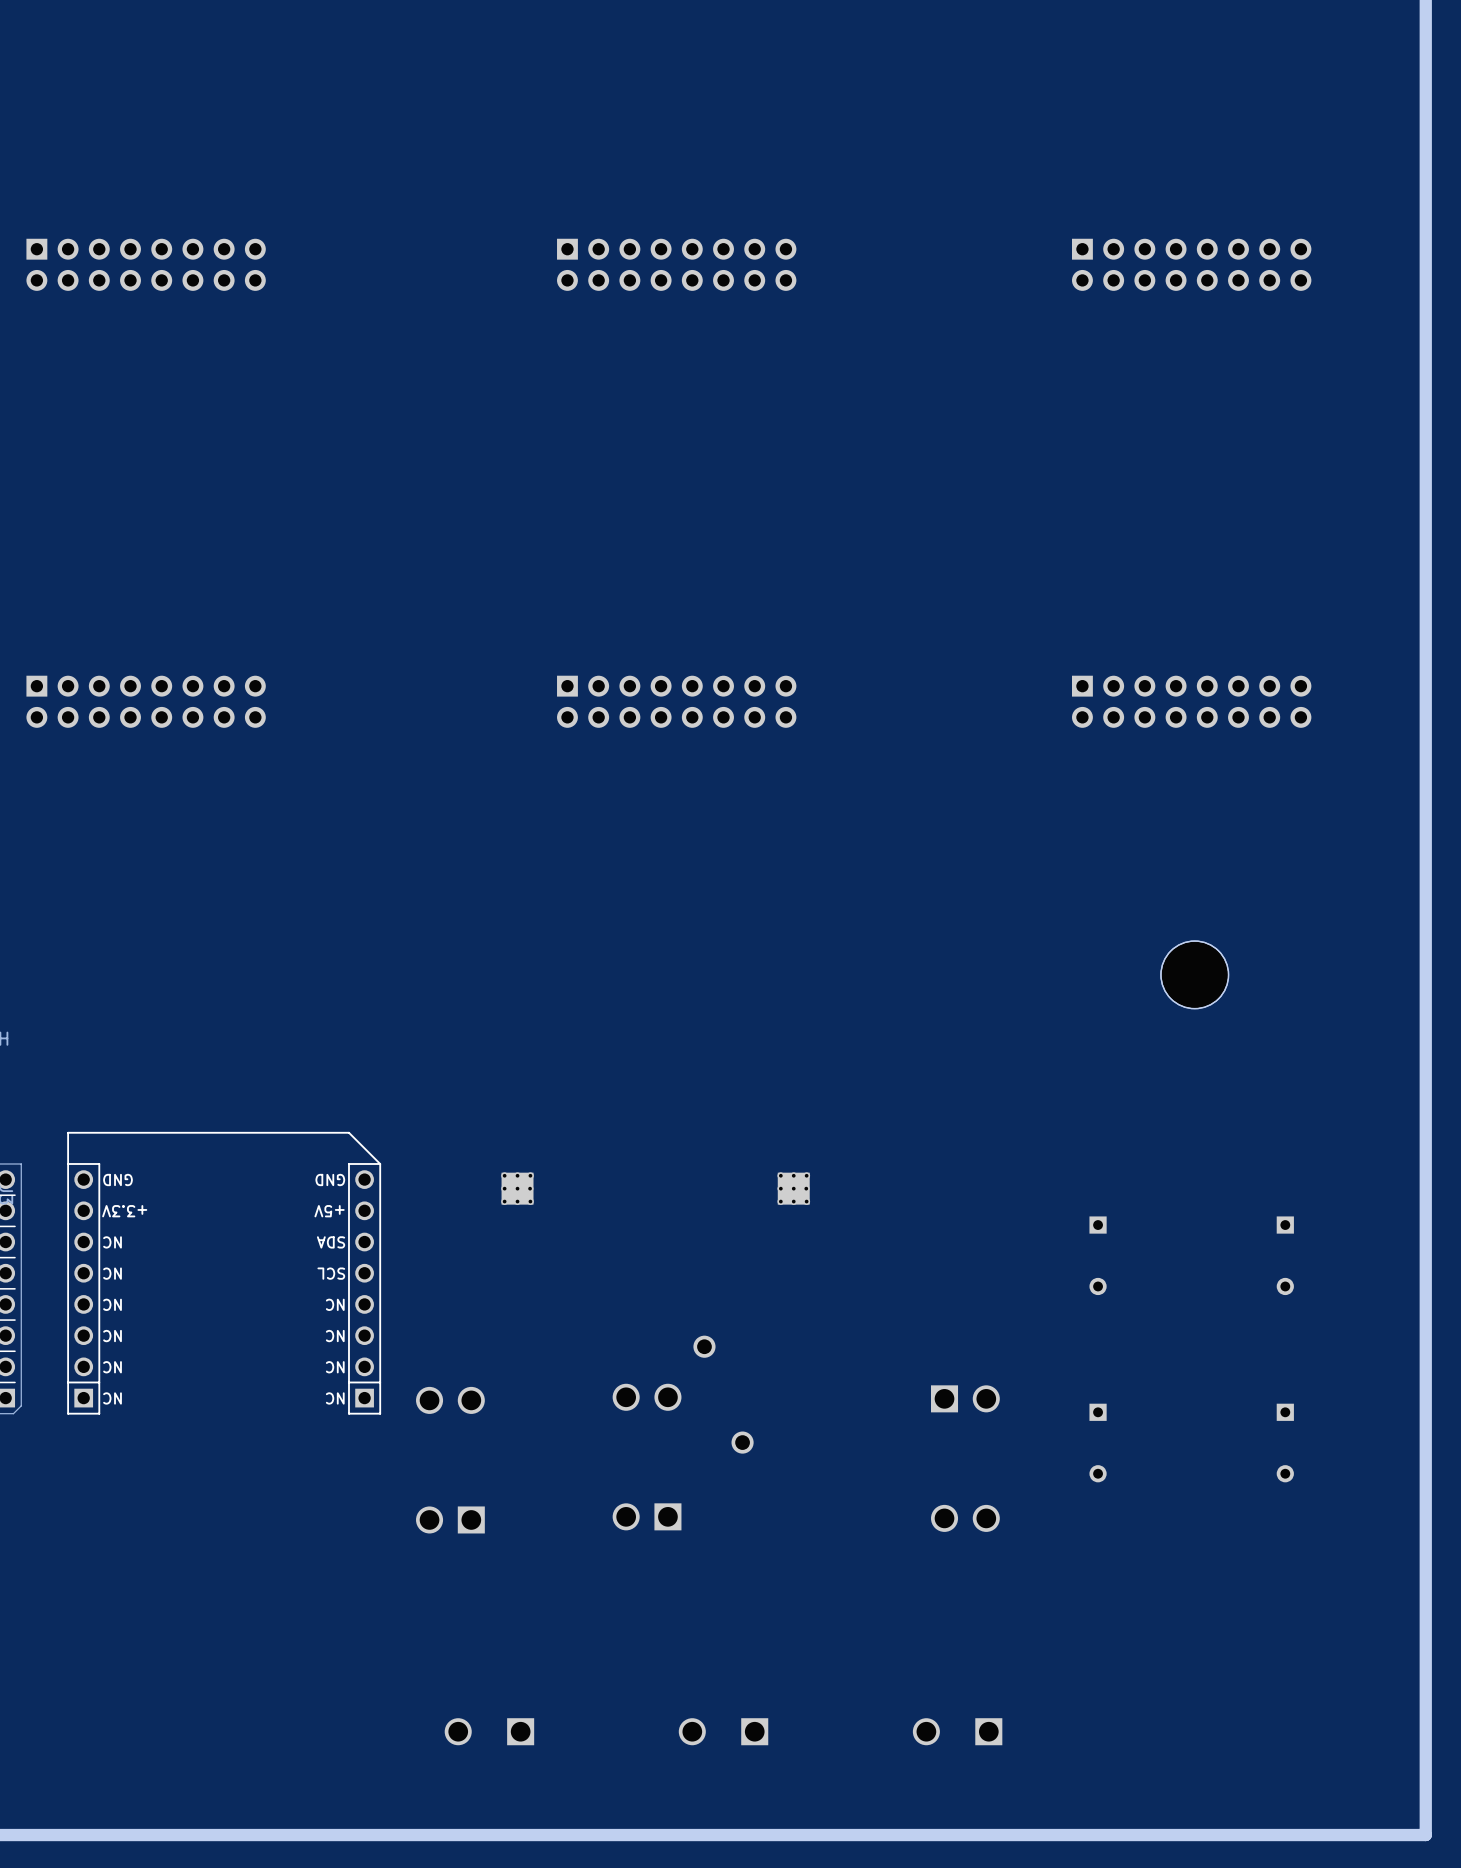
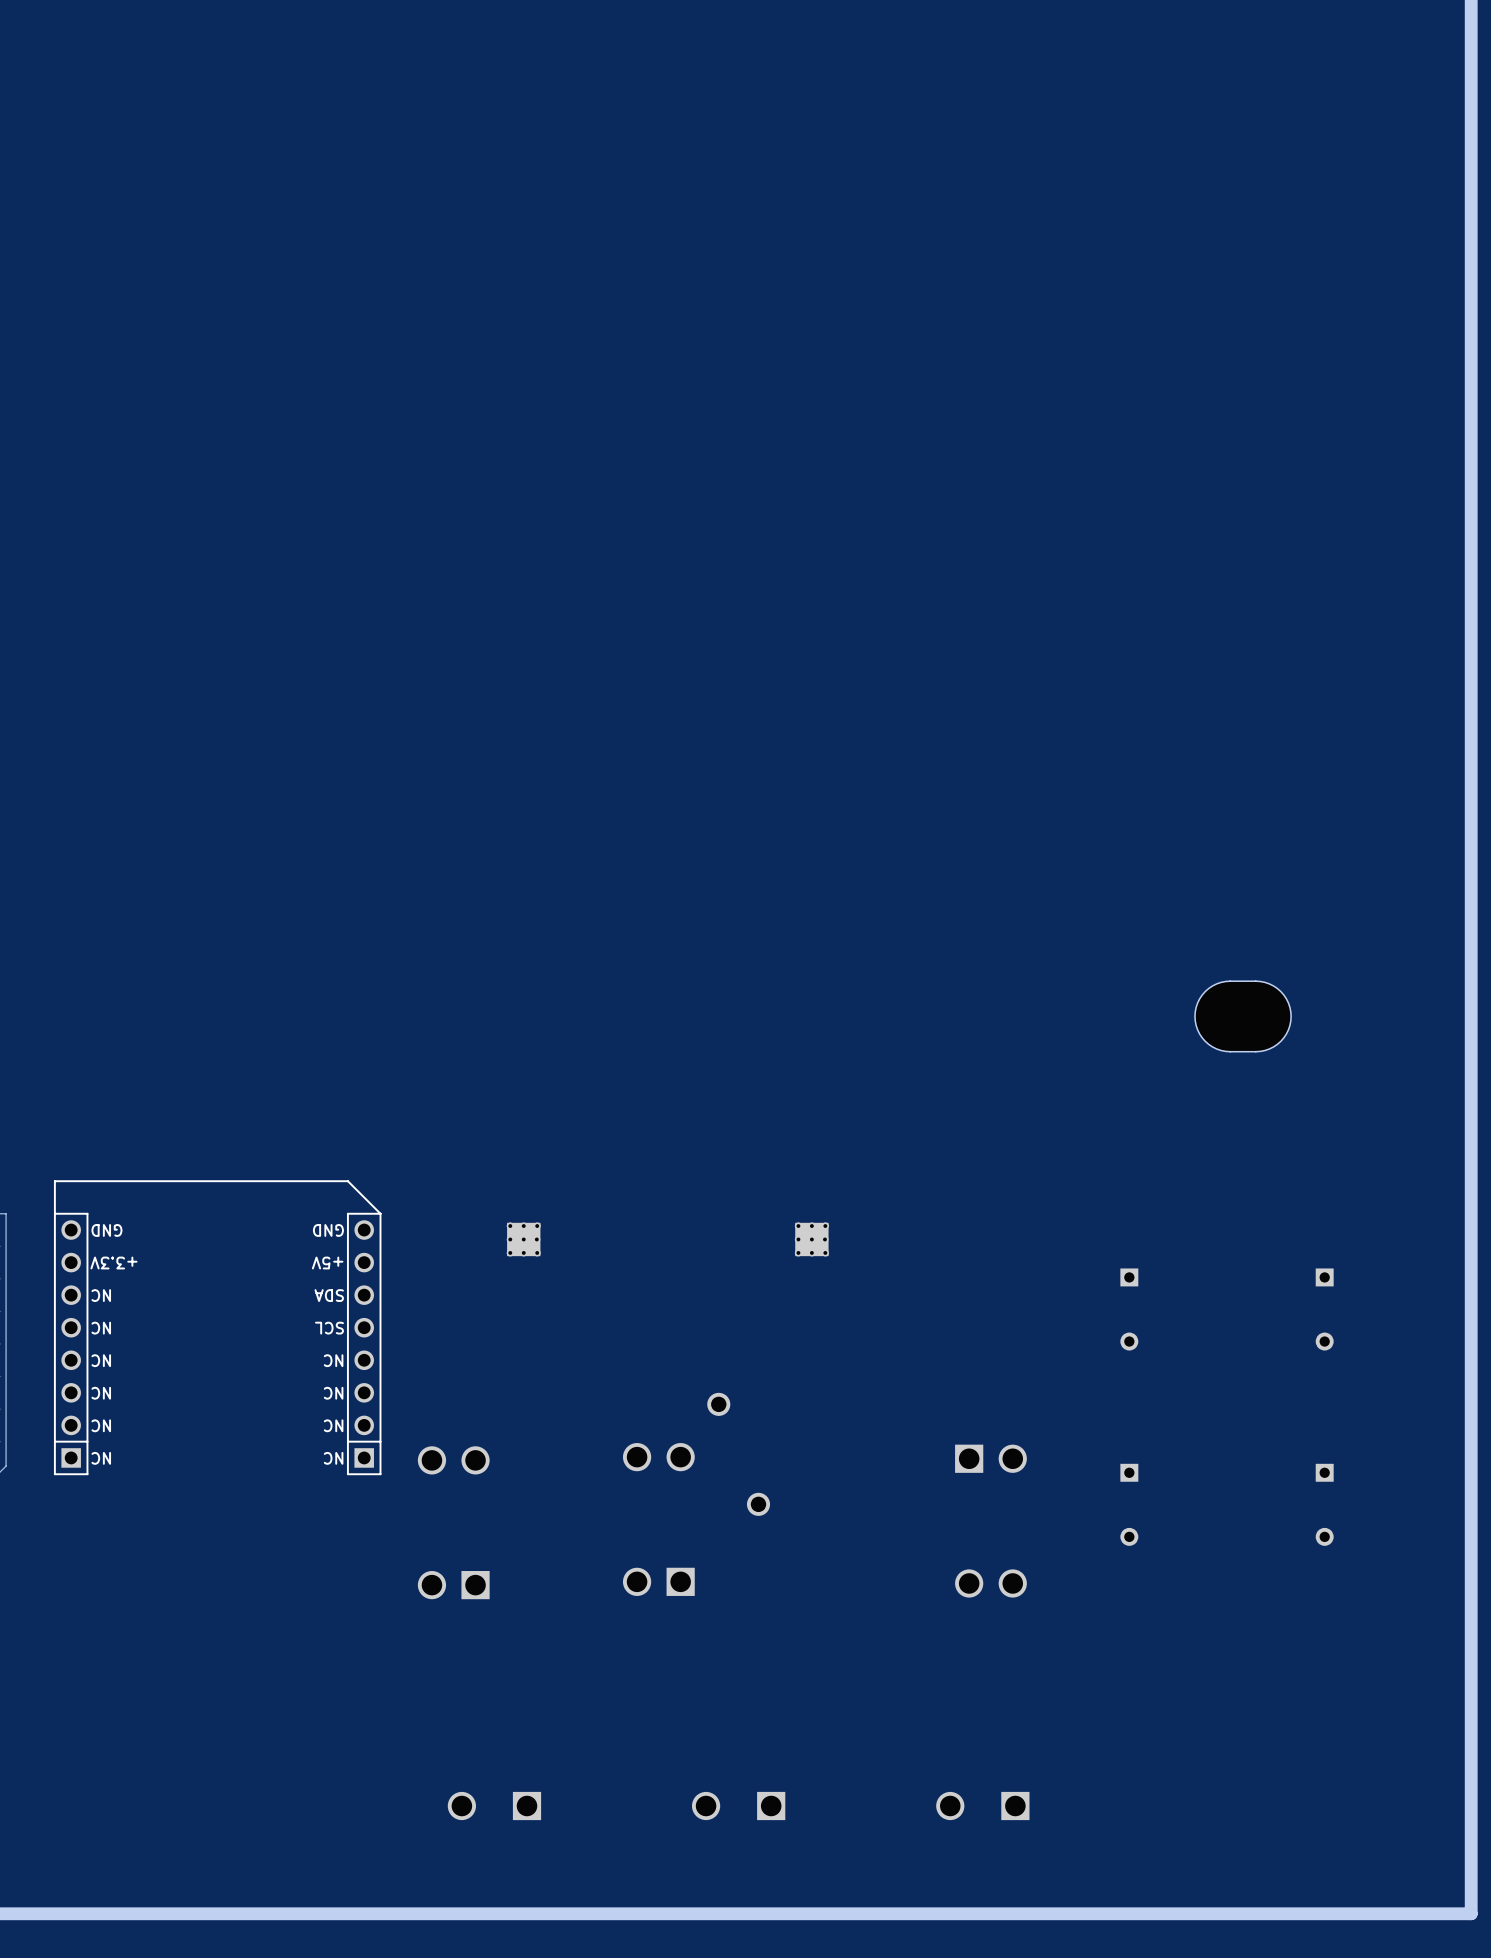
part: (146, 264) -> none
part: (676, 264) -> none
part: (1191, 264) -> none
part: (146, 701) -> none
part: (676, 701) -> none
part: (1191, 701) -> none
part footprint: [1160, 940, 1230, 1010] -> [1194, 980, 1292, 1053]

